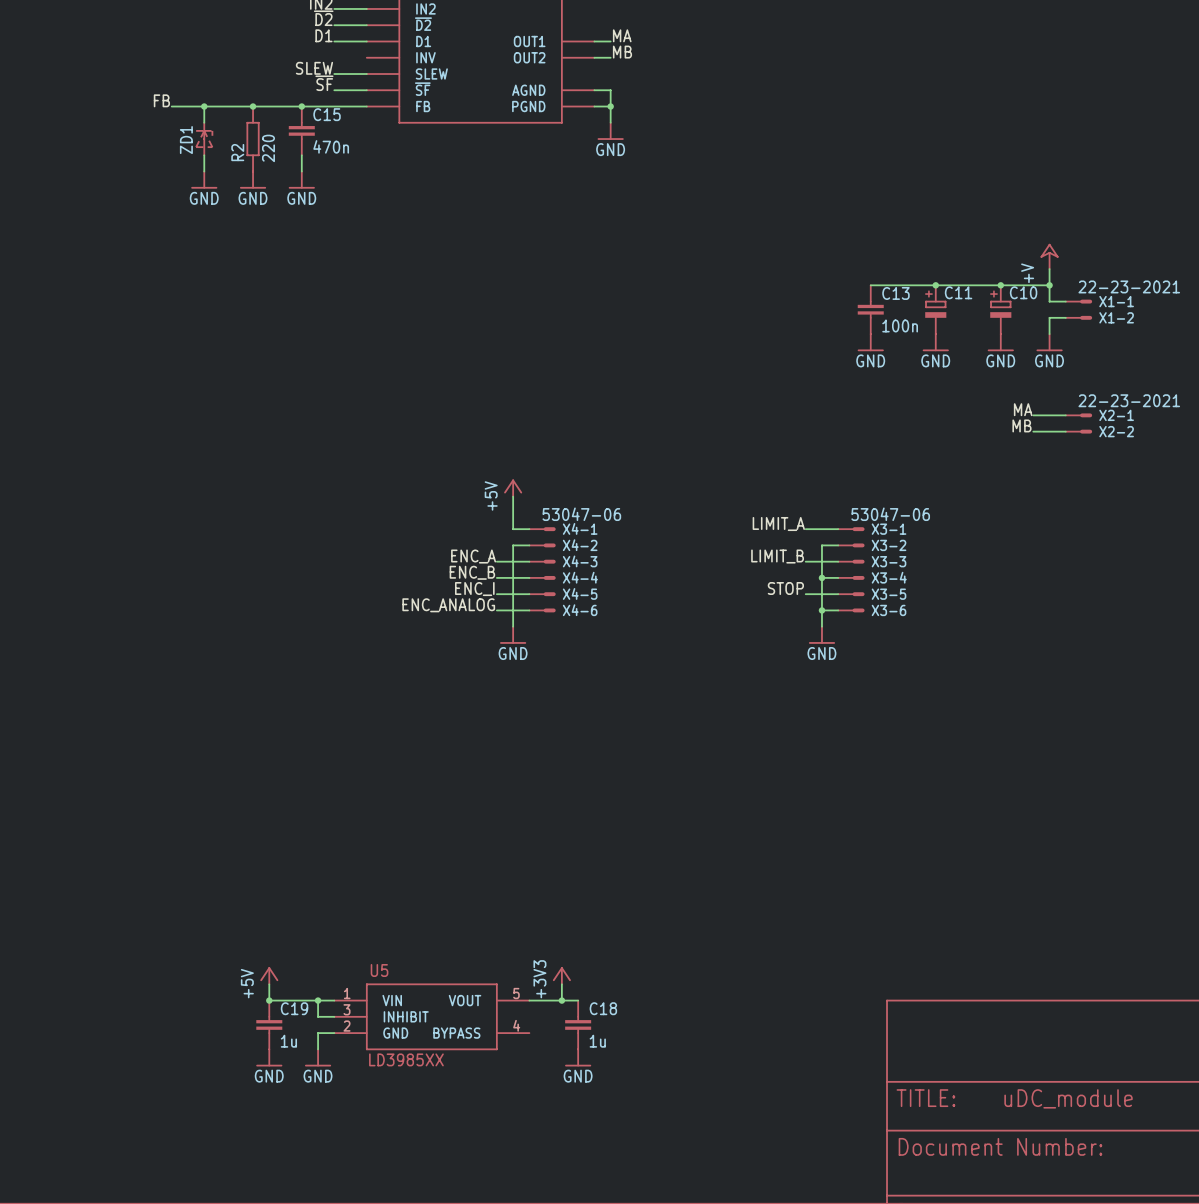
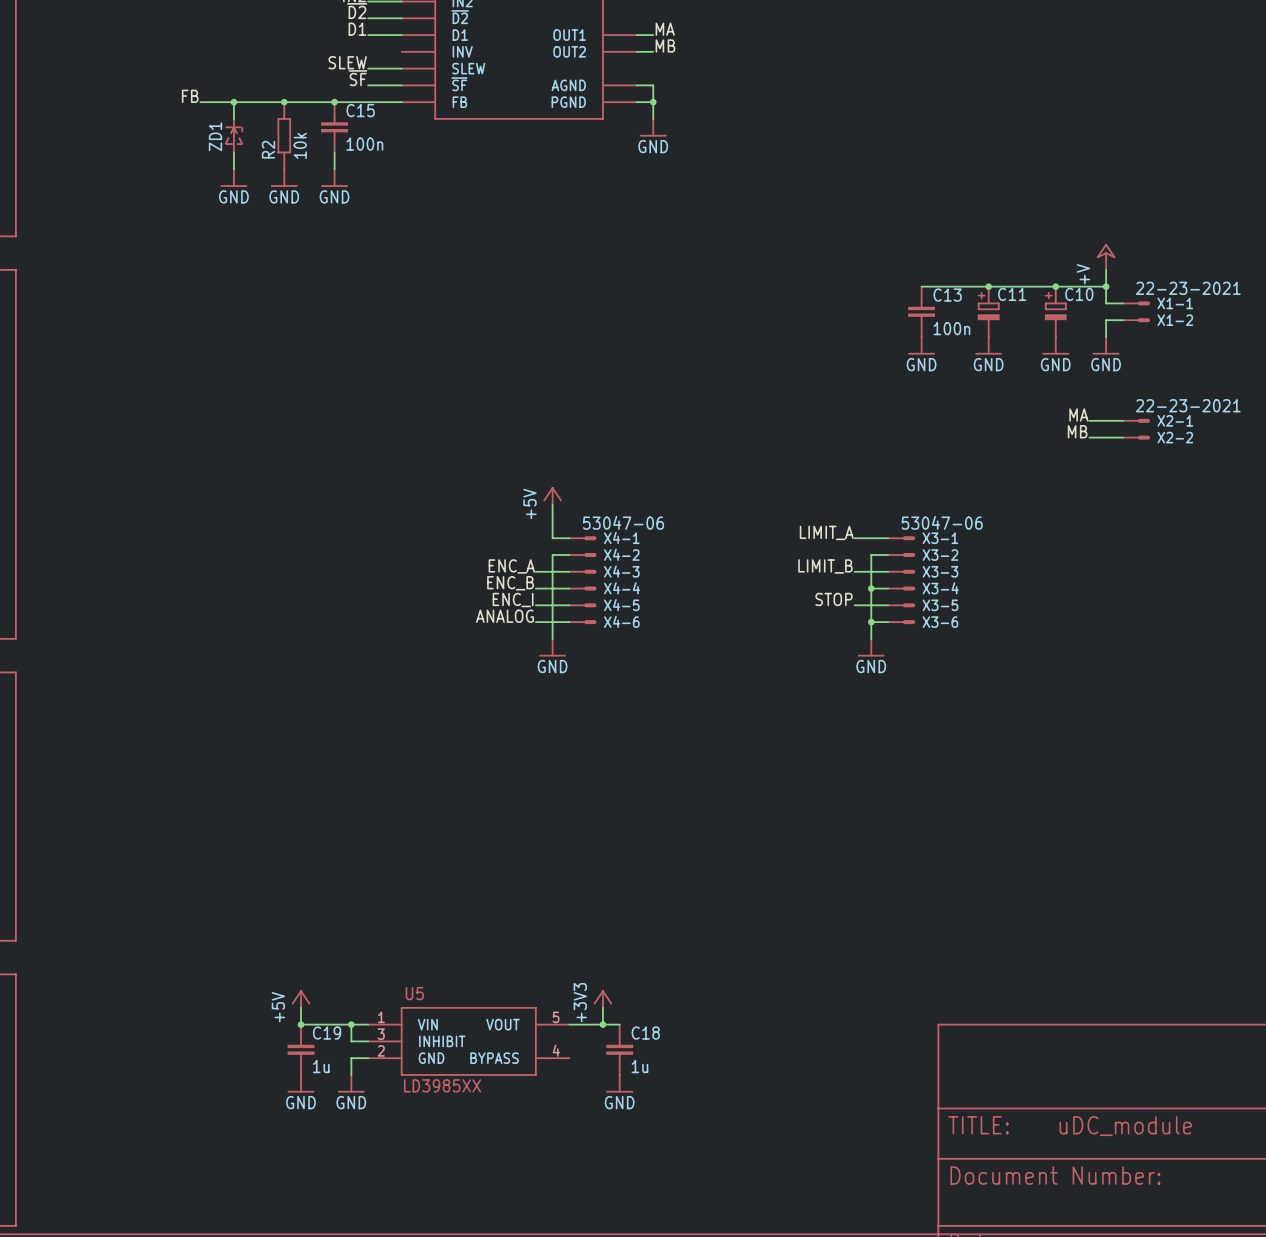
C15 value: 470n (331, 146) -> 100n (364, 144)
R2 value: 220 (268, 148) -> 10k (300, 145)
label: ENC_ANALOG (448, 605) -> ANALOG (505, 616)

